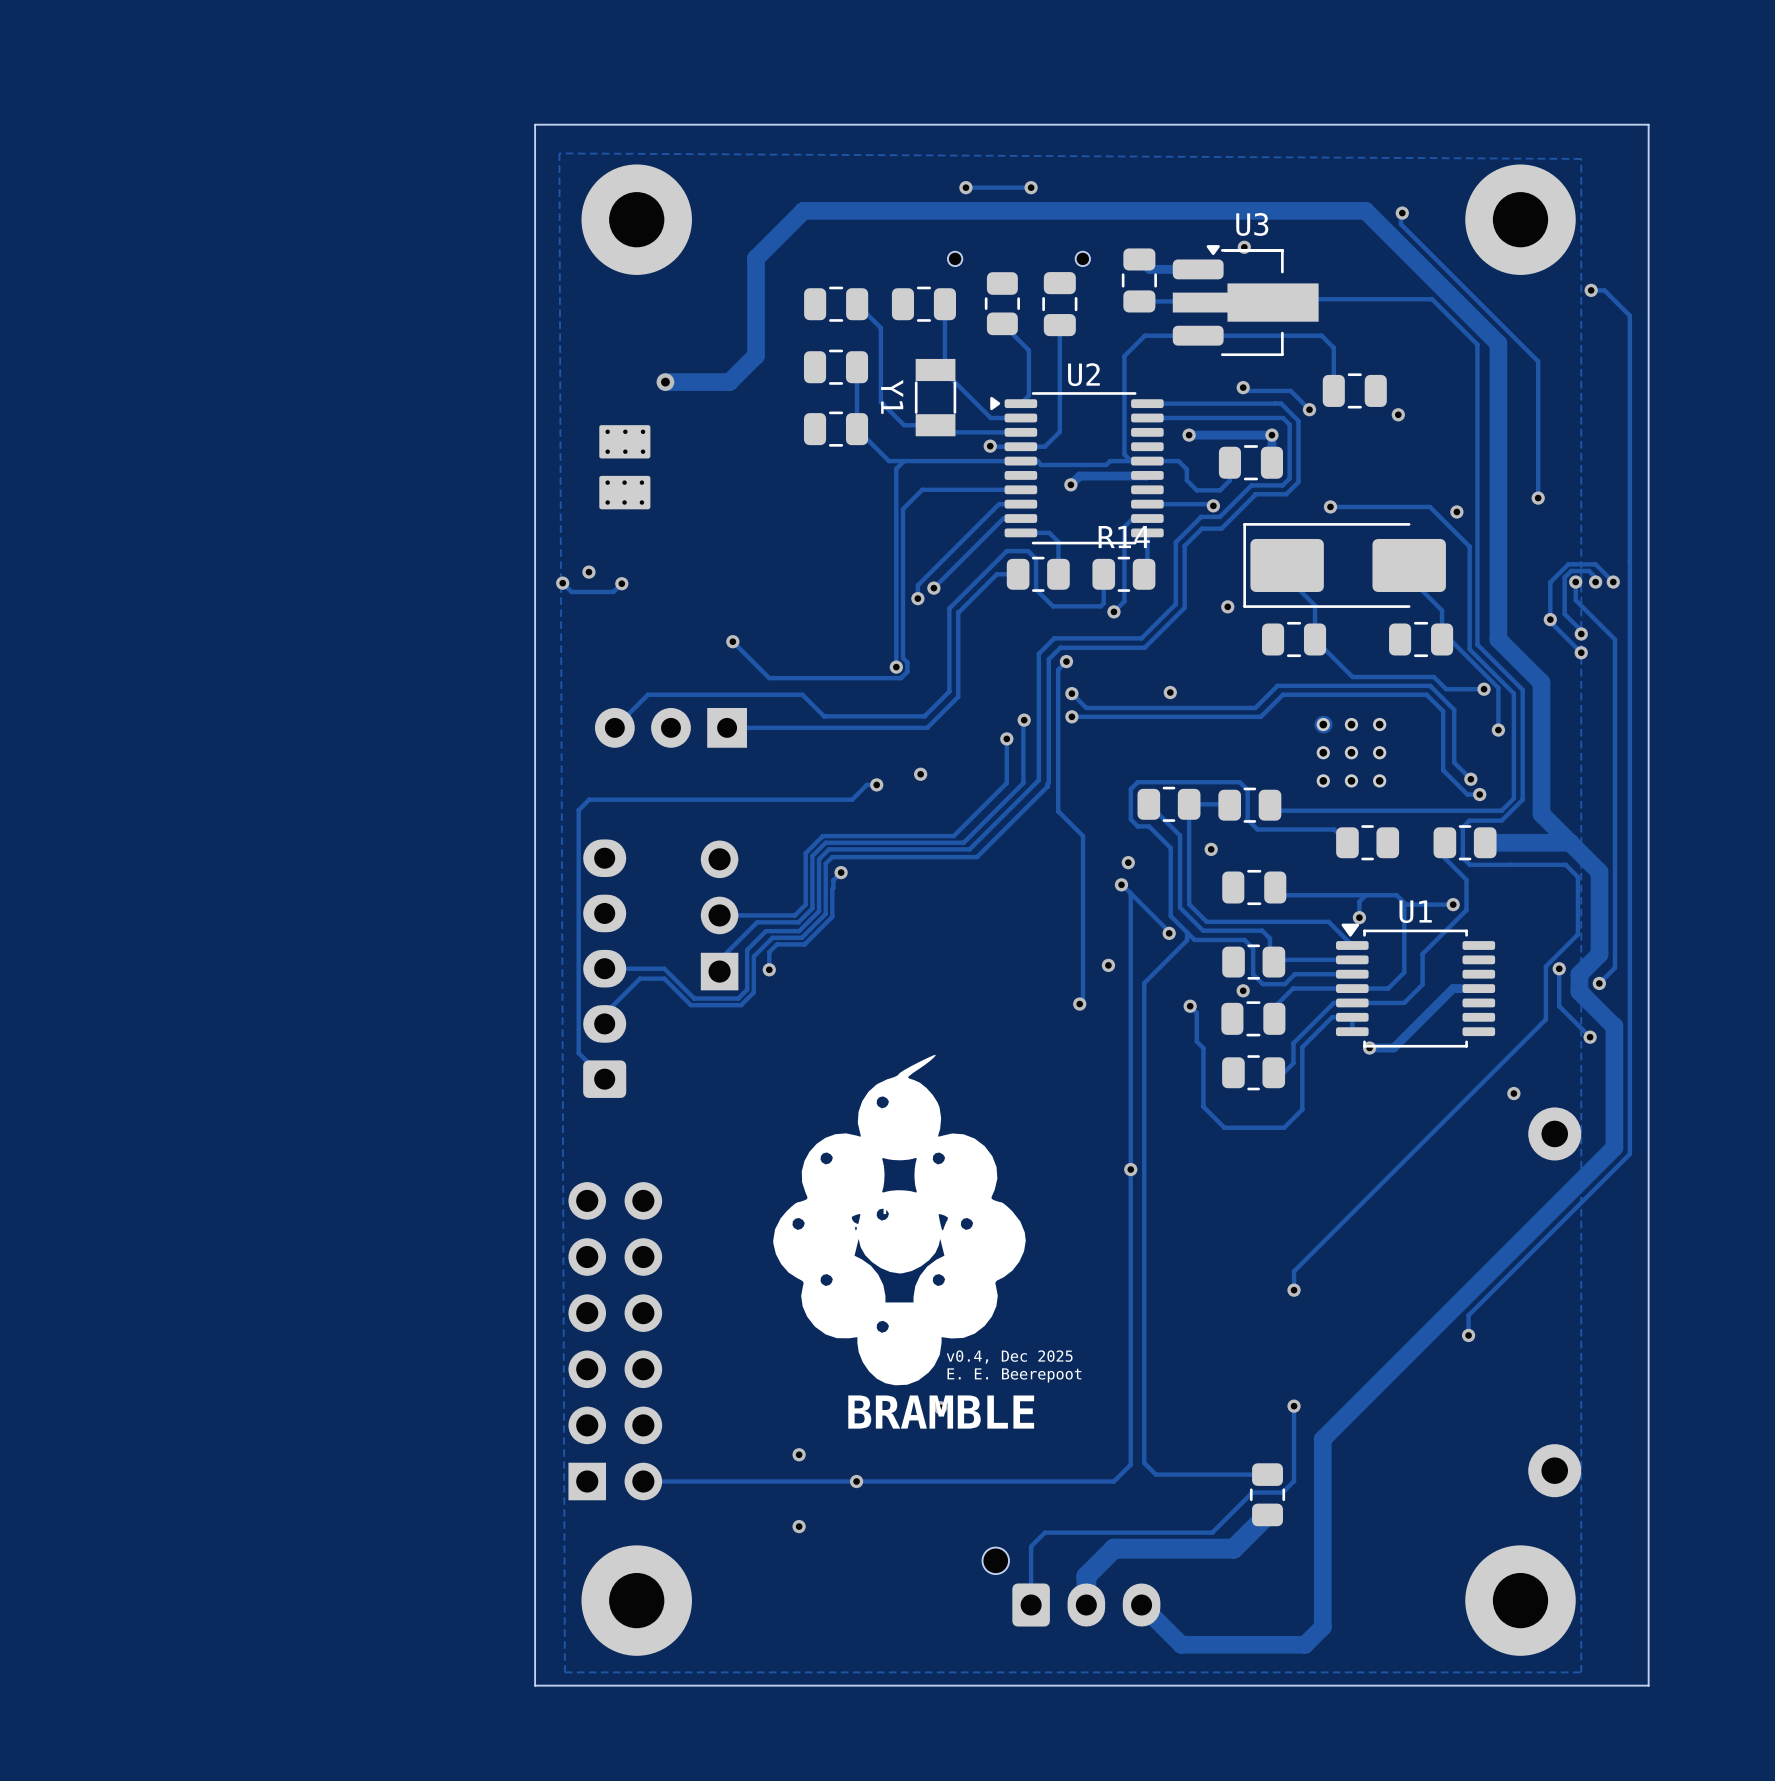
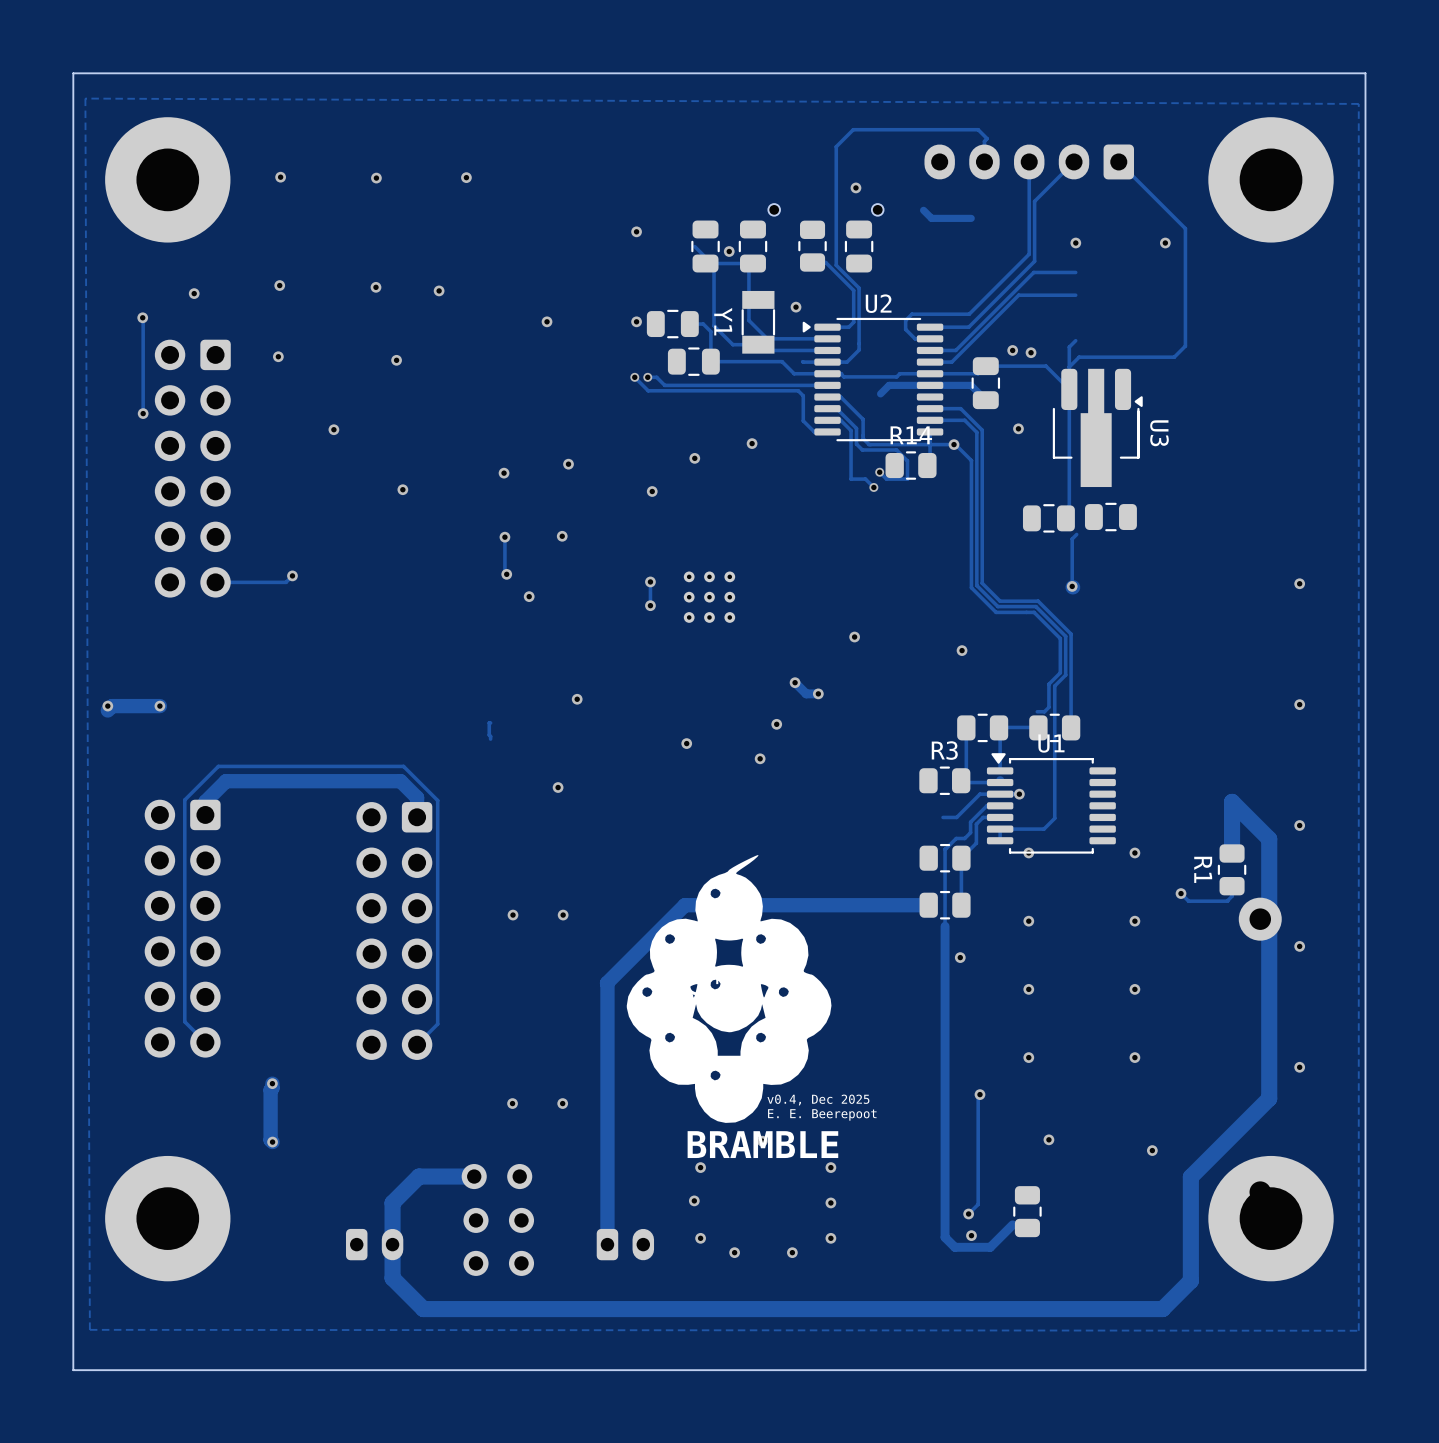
board edge: (1648, 124) (535, 124) (535, 1685) (1648, 1685) (1648, 124) -> (1365, 73) (1365, 1370) (73, 1370) (73, 73) (1365, 73)
zone outline: (559, 153) (1581, 158) (1581, 1672) (564, 1672) (559, 153) -> (85, 98) (1358, 103) (1358, 1330) (89, 1329) (85, 98)
via: (965, 187) -> none
track: (1031, 187) (965, 187) -> none
via: (1031, 187) -> none
part: none -> (1029, 161)
track: none -> (1118, 161) (1185, 228) (1185, 346) (1174, 357) (1079, 357) (1069, 367)
track: (1402, 213) (1401, 224) (1538, 361) (1538, 498) -> none
via: (1402, 213) -> none
via: none -> (280, 177)
via: none -> (376, 178)
via: none -> (466, 177)
part: (636, 219) -> none
part: (1520, 219) -> none
part: none -> (167, 179)
part: none -> (1271, 179)
via: none -> (855, 187)
via: (1244, 247) -> none
part: (1139, 280) -> none
via: none -> (636, 231)
track: (1591, 290) (1604, 290) (1629, 315) (1629, 1154) (1468, 1315) (1468, 1335) -> none
via: (1591, 290) -> none
via: none -> (1075, 243)
via: none -> (1165, 243)
U3 rotation: 0° (1245, 300) -> 90° clockwise (1097, 427)
U3 position: (1245, 300) -> (1097, 427)
track: (1139, 301) (1200, 302) (1203, 299) (1432, 299) (1477, 344) (1477, 644) (1522, 689) (1522, 799) (1501, 820) (1469, 820) (1462, 827) (1462, 857) (1469, 864) (1565, 864) (1577, 877) (1577, 934) (1545, 966) (1545, 1019) (1294, 1271) (1294, 1290) -> none
part rotation: 0° (836, 304) -> 90° clockwise (705, 246)
part rotation: 0° (923, 304) -> 90° clockwise (752, 246)
track: (944, 304) (944, 360) (935, 369) (942, 369) (990, 417) -> (705, 263) (752, 263) (748, 267) (748, 320) (767, 338) (803, 338)
via: none -> (729, 251)
track: (1002, 323) (1028, 350) (1028, 395) (1020, 403) -> (812, 262) (825, 262) (853, 290) (853, 322) (848, 327) (827, 327)
track: (1059, 325) (1059, 355) -> (984, 161) (984, 141) (987, 138) (978, 129) (853, 129) (836, 146) (836, 265) (859, 288)
track: none -> (1075, 272) (1033, 272) (955, 350) (930, 350)
via: none -> (279, 285)
via: none -> (375, 287)
via: none -> (439, 290)
via: none -> (194, 293)
track: none -> (1075, 295) (1018, 295) (951, 362) (930, 362)
part: (836, 367) -> none
track: (857, 367) (857, 429) (888, 461) (979, 461) -> (689, 324) (703, 324) (710, 331) (710, 361) (782, 361) (794, 373)
via: none -> (796, 307)
track: (665, 382) (729, 382) (756, 355) (756, 258) (803, 210) (1365, 210) (1498, 343) (1498, 639) (1541, 682) (1541, 814) (1599, 872) (1599, 954) (1579, 974) (1579, 991) (1614, 1026) (1614, 1147) (1322, 1439) (1322, 1627) (1305, 1644) (1181, 1644) (1141, 1605) -> none
via position: (665, 382) -> (547, 321)
track: (1243, 387) (1246, 390) (1290, 390) (1309, 409) -> none
via: (1243, 387) -> none
track: (1333, 390) (1333, 347) (1321, 335) (1144, 335) (1124, 356) (1124, 454) (1131, 461) -> none
part: (1354, 390) -> none
track: none -> (142, 317) (143, 413)
via: none -> (142, 317)
via: none -> (636, 321)
part: none -> (672, 324)
track: (1195, 403) (1281, 403) (1298, 420) (1298, 482) (1286, 494) (1255, 494) (1221, 528) (1201, 528) (1184, 545) (1184, 607) (1144, 647) (1060, 647) (1048, 659) (1047, 786) (976, 857) (832, 857) (825, 863) (825, 913) (801, 937) (772, 937) (753, 956) (753, 992) (741, 1005) (690, 1005) (664, 978) (640, 978) (604, 1013) (604, 1023) -> (968, 327) (1034, 261) (1034, 201) (1074, 161) (1074, 170)
via: (1309, 409) -> none
via: (1398, 414) -> none
track: (1147, 417) (1282, 417) (1289, 424) (1289, 478) (1282, 485) (1251, 485) (1219, 516) (1201, 516) (1175, 542) (1175, 604) (1141, 638) (1054, 638) (1038, 653) (1038, 780) (969, 849) (828, 849) (819, 859) (819, 911) (799, 931) (765, 931) (747, 949) (747, 989) (738, 998) (694, 998) (664, 968) (604, 968) -> (930, 338) (915, 338) (905, 329) (905, 320) (911, 314) (969, 314) (1029, 254) (1029, 161)
track: none -> (1075, 340) (1069, 347) (1069, 506) (1059, 516)
part: (836, 429) -> none
via: none -> (1012, 350)
track: (1189, 435) (1271, 435) (1271, 462) -> none
via: (1189, 435) -> none
via: none -> (278, 356)
via: none -> (396, 360)
part: none -> (693, 361)
via: (990, 446) -> none
track: (904, 461) (896, 468) (896, 667) -> none
track: (1178, 461) (1186, 469) (1186, 480) (1196, 490) (1220, 490) (1229, 480) (1229, 462) -> (955, 373) (978, 373) (985, 366) (1046, 366) (1069, 389)
part rotation: 0° (1250, 462) -> 90° clockwise (985, 383)
via: none -> (634, 377)
track: none -> (647, 377) (656, 377) (664, 385) (827, 385)
via: none -> (647, 377)
part: (624, 467) -> none
track: (1147, 475) (1079, 476) (1070, 484) -> none
via: (1070, 484) -> none
track: none -> (880, 393) (889, 385) (971, 385) (985, 400)
track: (1020, 489) (922, 489) (902, 509) (902, 658) (907, 662) (907, 671) (900, 678) (769, 678) (732, 641) -> (827, 397) (840, 397) (863, 419) (863, 438) (869, 444) (955, 444) (971, 460) (971, 587) (996, 612) (1034, 612) (1060, 638) (1060, 672) (1048, 684) (1048, 707) (1044, 711) (1037, 711)
via: (1538, 498) -> none
track: (1020, 504) (999, 504) (917, 585) (917, 598) -> (827, 408) (836, 408) (856, 428) (856, 444) (862, 449) (896, 449) (907, 460) (907, 479) (886, 479) (879, 472)
track: (1185, 504) (1211, 504) (1212, 505) -> (960, 408) (982, 430) (982, 583) (1000, 601) (1038, 601) (1071, 634) (1071, 727)
via: (1213, 505) -> none
track: (1330, 506) (1429, 506) (1469, 546) (1469, 649) (1513, 693) (1513, 798) (1501, 810) (1275, 810) (1270, 805) -> none
via: (1330, 506) -> none
via: none -> (143, 413)
via: (1456, 511) -> none
track: (1020, 518) (1003, 518) (933, 588) -> (827, 420) (840, 420) (851, 430) (851, 479) (865, 479) (873, 487)
track: (1147, 518) (1132, 518) (1124, 526) (1124, 601) (1113, 611) -> (930, 420) (964, 420) (976, 432) (976, 585) (997, 606) (1035, 606) (1065, 636) (1065, 675) (1054, 686) (1054, 818) (1044, 829) (1000, 829) (1000, 840)
via: none -> (1018, 428)
via: none -> (333, 429)
track: (1020, 532) (1049, 532) (1058, 542) -> (827, 431) (814, 431) (803, 420) (803, 395) (798, 390) (648, 390) (634, 377)
track: (1058, 542) (1058, 574) -> none
via: none -> (752, 443)
via: none -> (954, 444)
via: none -> (694, 458)
part: (1344, 565) -> none
track: (1277, 567) (1315, 605) (1315, 639) (1352, 677) (1433, 677) (1446, 689) (1484, 689) -> none
track: (1399, 567) (1442, 610) (1442, 639) (1449, 639) (1498, 687) (1498, 730) -> none
via: (588, 572) -> none
via: none -> (568, 464)
track: (1018, 574) (996, 574) (958, 612) (958, 696) (927, 727) (727, 727) -> none
part: (1038, 574) -> none
track: (1103, 574) (1103, 603) (1100, 606) (1053, 606) (1036, 589) (1036, 559) (1028, 551) (1006, 551) (949, 608) (949, 691) (924, 716) (824, 716) (802, 694) (648, 694) (614, 727) -> none
part: none -> (192, 468)
via: none -> (879, 472)
track: (1575, 582) (1575, 600) (1614, 639) (1614, 967) (1599, 983) -> none
via: (1575, 582) -> none
track: (1595, 582) (1595, 577) (1588, 571) (1571, 571) (1564, 577) (1564, 614) (1580, 629) (1581, 633) -> none
via: (1595, 582) -> none
track: (1613, 582) (1595, 564) (1568, 564) (1550, 582) (1550, 621) (1581, 652) -> none
via: (1613, 582) -> none
track: (562, 583) (571, 591) (613, 591) (621, 583) -> none
via: (562, 583) -> none
via: (933, 588) -> none
via: (917, 598) -> none
via: none -> (873, 487)
via: none -> (402, 489)
via: none -> (652, 491)
via: (1227, 606) -> none
via: (1113, 611) -> none
via: (1550, 619) -> none
via: (1581, 633) -> none
part position: (1421, 639) -> (1110, 517)
via: (732, 641) -> none
via: (1581, 652) -> none
track: none -> (1076, 534) (1072, 538) (1072, 586)
via: none -> (562, 536)
track: (1066, 661) (1058, 669) (1058, 811) (1083, 836) (1083, 1000) (1079, 1004) -> none
via: (1066, 661) -> none
track: none -> (504, 537) (504, 572) (506, 574)
via: none -> (504, 537)
via: (896, 667) -> none
via: (1484, 689) -> none
via: (1170, 692) -> none
track: (1071, 693) (1086, 707) (1255, 707) (1277, 685) (1430, 685) (1454, 709) (1454, 762) (1470, 779) -> none
via: (1071, 693) -> none
via: none -> (506, 574)
track: none -> (292, 575) (286, 582) (215, 582)
via: none -> (292, 575)
track: (1071, 716) (1260, 716) (1282, 694) (1426, 694) (1443, 711) (1443, 770) (1467, 794) (1479, 794) -> none
via: (1071, 716) -> none
track: none -> (650, 581) (650, 605)
via: none -> (650, 581)
track: (1024, 720) (1023, 783) (963, 842) (825, 842) (812, 855) (812, 908) (798, 922) (757, 922) (719, 959) (719, 971) -> none
via: (1024, 720) -> none
via: none -> (1299, 583)
via: none -> (1072, 586)
part: (670, 727) -> none
via: (1498, 730) -> none
via: none -> (529, 596)
part: none -> (709, 597)
track: (1006, 738) (1006, 783) (953, 836) (822, 836) (805, 853) (805, 904) (794, 915) (719, 915) -> none
via: (1006, 738) -> none
via: none -> (650, 605)
part: (1351, 752) -> none
via: (920, 774) -> none
via: (1470, 779) -> none
track: (876, 784) (866, 784) (852, 799) (589, 799) (578, 810) (578, 1053) (604, 1079) -> none
via: (876, 784) -> none
via: none -> (854, 637)
via: (1479, 794) -> none
via: none -> (962, 650)
track: (1148, 804) (1180, 835) (1180, 907) (1203, 930) (1262, 930) (1270, 938) (1270, 957) (1272, 959) (1352, 959) -> none
part: (1168, 804) -> none
track: (1229, 805) (1189, 804) (1189, 904) (1206, 921) (1328, 921) (1352, 945) -> none
part: (1249, 805) -> none
track: none -> (795, 682) (806, 693) (818, 693)
via: none -> (795, 682)
track: (1347, 842) (1334, 829) (1257, 829) (1247, 819) (1247, 790) (1239, 782) (1137, 782) (1130, 789) (1130, 819) (1137, 826) (1149, 826) (1170, 848) (1170, 916) (1194, 939) (1244, 939) (1253, 948) (1253, 974) (1262, 984) (1284, 984) (1294, 974) (1352, 974) -> none
part: (1367, 842) -> none
track: (1444, 842) (1444, 858) (1466, 879) (1466, 910) (1422, 953) (1422, 984) (1404, 1002) (1333, 1002) (1293, 1043) (1293, 1063) (1283, 1072) (1270, 1072) -> none
part: (1465, 842) -> none
track: (1570, 842) (1485, 842) -> none
via: (1211, 849) -> none
via: none -> (818, 693)
via: none -> (577, 699)
via: (1128, 862) -> none
via: none -> (1299, 704)
via: none -> (107, 706)
track: none -> (159, 706) (112, 706) (107, 710)
via: none -> (159, 706)
track: (841, 872) (833, 880) (832, 916) (804, 944) (776, 944) (769, 952) (769, 969) -> none
via position: (841, 872) -> (686, 743)
track: (1121, 884) (1169, 933) (1170, 932) -> none
via: (1121, 884) -> none
part: (1254, 887) -> none
track: none -> (490, 722) (490, 739)
via: none -> (776, 724)
track: (1130, 893) (1130, 1464) (1113, 1481) (643, 1481) -> none
track: (1270, 895) (1396, 895) (1406, 904) (1453, 904) -> none
track: (1365, 895) (1359, 901) (1359, 917) -> none
track: none -> (966, 727) (966, 775) (961, 780) (962, 782) (1000, 782)
part: none -> (982, 727)
track: none -> (1040, 727) (999, 727) (1000, 770)
part: none -> (1054, 727)
track: (1404, 902) (1404, 972) (1388, 988) (1293, 988) (1274, 1007) (1274, 1018) -> none
via: (1453, 904) -> none
part: (719, 915) -> none
via: (1359, 917) -> none
track: (1187, 932) (1187, 940) (1144, 983) (1144, 1463) (1155, 1474) (1267, 1474) -> none
via: (1169, 933) -> none
via: none -> (760, 758)
part: (1253, 962) -> none
R3: none -> (944, 780)
via: (1108, 965) -> none
part: (604, 968) -> none
track: (1559, 968) (1559, 1006) (1590, 1037) -> none
via: (1559, 968) -> none
via: (769, 969) -> none
via: none -> (558, 787)
track: none -> (1019, 794) (979, 794) (956, 817) (943, 817)
via: (1599, 983) -> none
U1 position: (1415, 985) -> (1051, 803)
track: (1478, 988) (1453, 988) (1393, 1048) (1369, 1048) -> none
via position: (1243, 990) -> (1019, 794)
track: none -> (1000, 805) (986, 805) (970, 822) (970, 832) (964, 838) (956, 838) (945, 849) (945, 1237) (954, 1247) (990, 1247) (1012, 1224)
via: (1079, 1004) -> none
track: none -> (205, 814) (205, 801) (225, 781) (400, 781) (417, 797) (417, 817)
track: (1190, 1006) (1196, 1012) (1196, 1041) (1203, 1048) (1203, 1106) (1224, 1127) (1284, 1127) (1302, 1109) (1302, 1047) (1332, 1017) (1352, 1017) (1352, 1031) -> none
via: (1190, 1006) -> none
track: none -> (1000, 817) (983, 817) (976, 824) (976, 843) (961, 858) (961, 905)
part: (1253, 1018) -> none
via: none -> (1299, 825)
via: (1590, 1037) -> none
via position: (1369, 1048) -> (1134, 852)
via: none -> (1028, 852)
track: none -> (1232, 853) (1232, 801) (1269, 839) (1269, 1098) (1190, 1176) (1190, 1280) (1162, 1309) (423, 1309) (392, 1278) (392, 1202) (418, 1176) (474, 1176)
part: none -> (945, 858)
part: (1253, 1072) -> none
R1: none -> (1232, 869)
via: (1513, 1093) -> none
track: none -> (1231, 887) (1232, 896) (1227, 901) (1188, 901) (1181, 893)
via: none -> (1181, 893)
track: none -> (928, 905) (684, 905) (607, 983) (607, 1244)
part: none -> (945, 905)
via: none -> (512, 915)
via: none -> (563, 915)
via: none -> (1028, 921)
via: none -> (1134, 921)
part: none -> (182, 928)
part: none -> (394, 931)
via: none -> (1299, 946)
via position: (1130, 1169) -> (960, 957)
via: none -> (1028, 989)
via: none -> (1134, 989)
track: none -> (205, 1042) (184, 1021) (184, 799) (218, 766) (403, 766) (437, 800) (437, 1024) (417, 1044)
via position: (1294, 1290) -> (1028, 1057)
via: none -> (1134, 1057)
via: none -> (1299, 1067)
via: (1468, 1335) -> none
track: none -> (272, 1083) (270, 1090) (270, 1140) (272, 1142)
via: none -> (272, 1083)
part: (615, 1341) -> none
track: none -> (979, 1094) (978, 1096) (978, 1204) (968, 1213)
via: none -> (979, 1094)
via: none -> (512, 1103)
via: none -> (562, 1103)
track: (1294, 1406) (1294, 1481) (1282, 1492) (1252, 1492) (1212, 1532) (1044, 1532) (1031, 1546) (1031, 1605) -> none
via: none -> (272, 1142)
via: none -> (1152, 1150)
via: none -> (700, 1167)
via: none -> (830, 1167)
part: none -> (496, 1176)
via: (799, 1454) -> none
via: none -> (830, 1202)
via: none -> (968, 1213)
part: none -> (167, 1218)
part: none -> (1271, 1218)
part: none -> (498, 1220)
track: (1267, 1514) (1233, 1548) (1113, 1548) (1086, 1576) (1086, 1605) -> none
via: none -> (971, 1235)
via: (799, 1526) -> none
via: none -> (700, 1238)
via: none -> (830, 1238)
part: none -> (374, 1244)
part: none -> (625, 1244)
via: none -> (734, 1252)
via: none -> (792, 1252)
part: none -> (498, 1263)
part: (1071, 1587) -> none
part: (636, 1600) -> none
part: (1520, 1600) -> none

